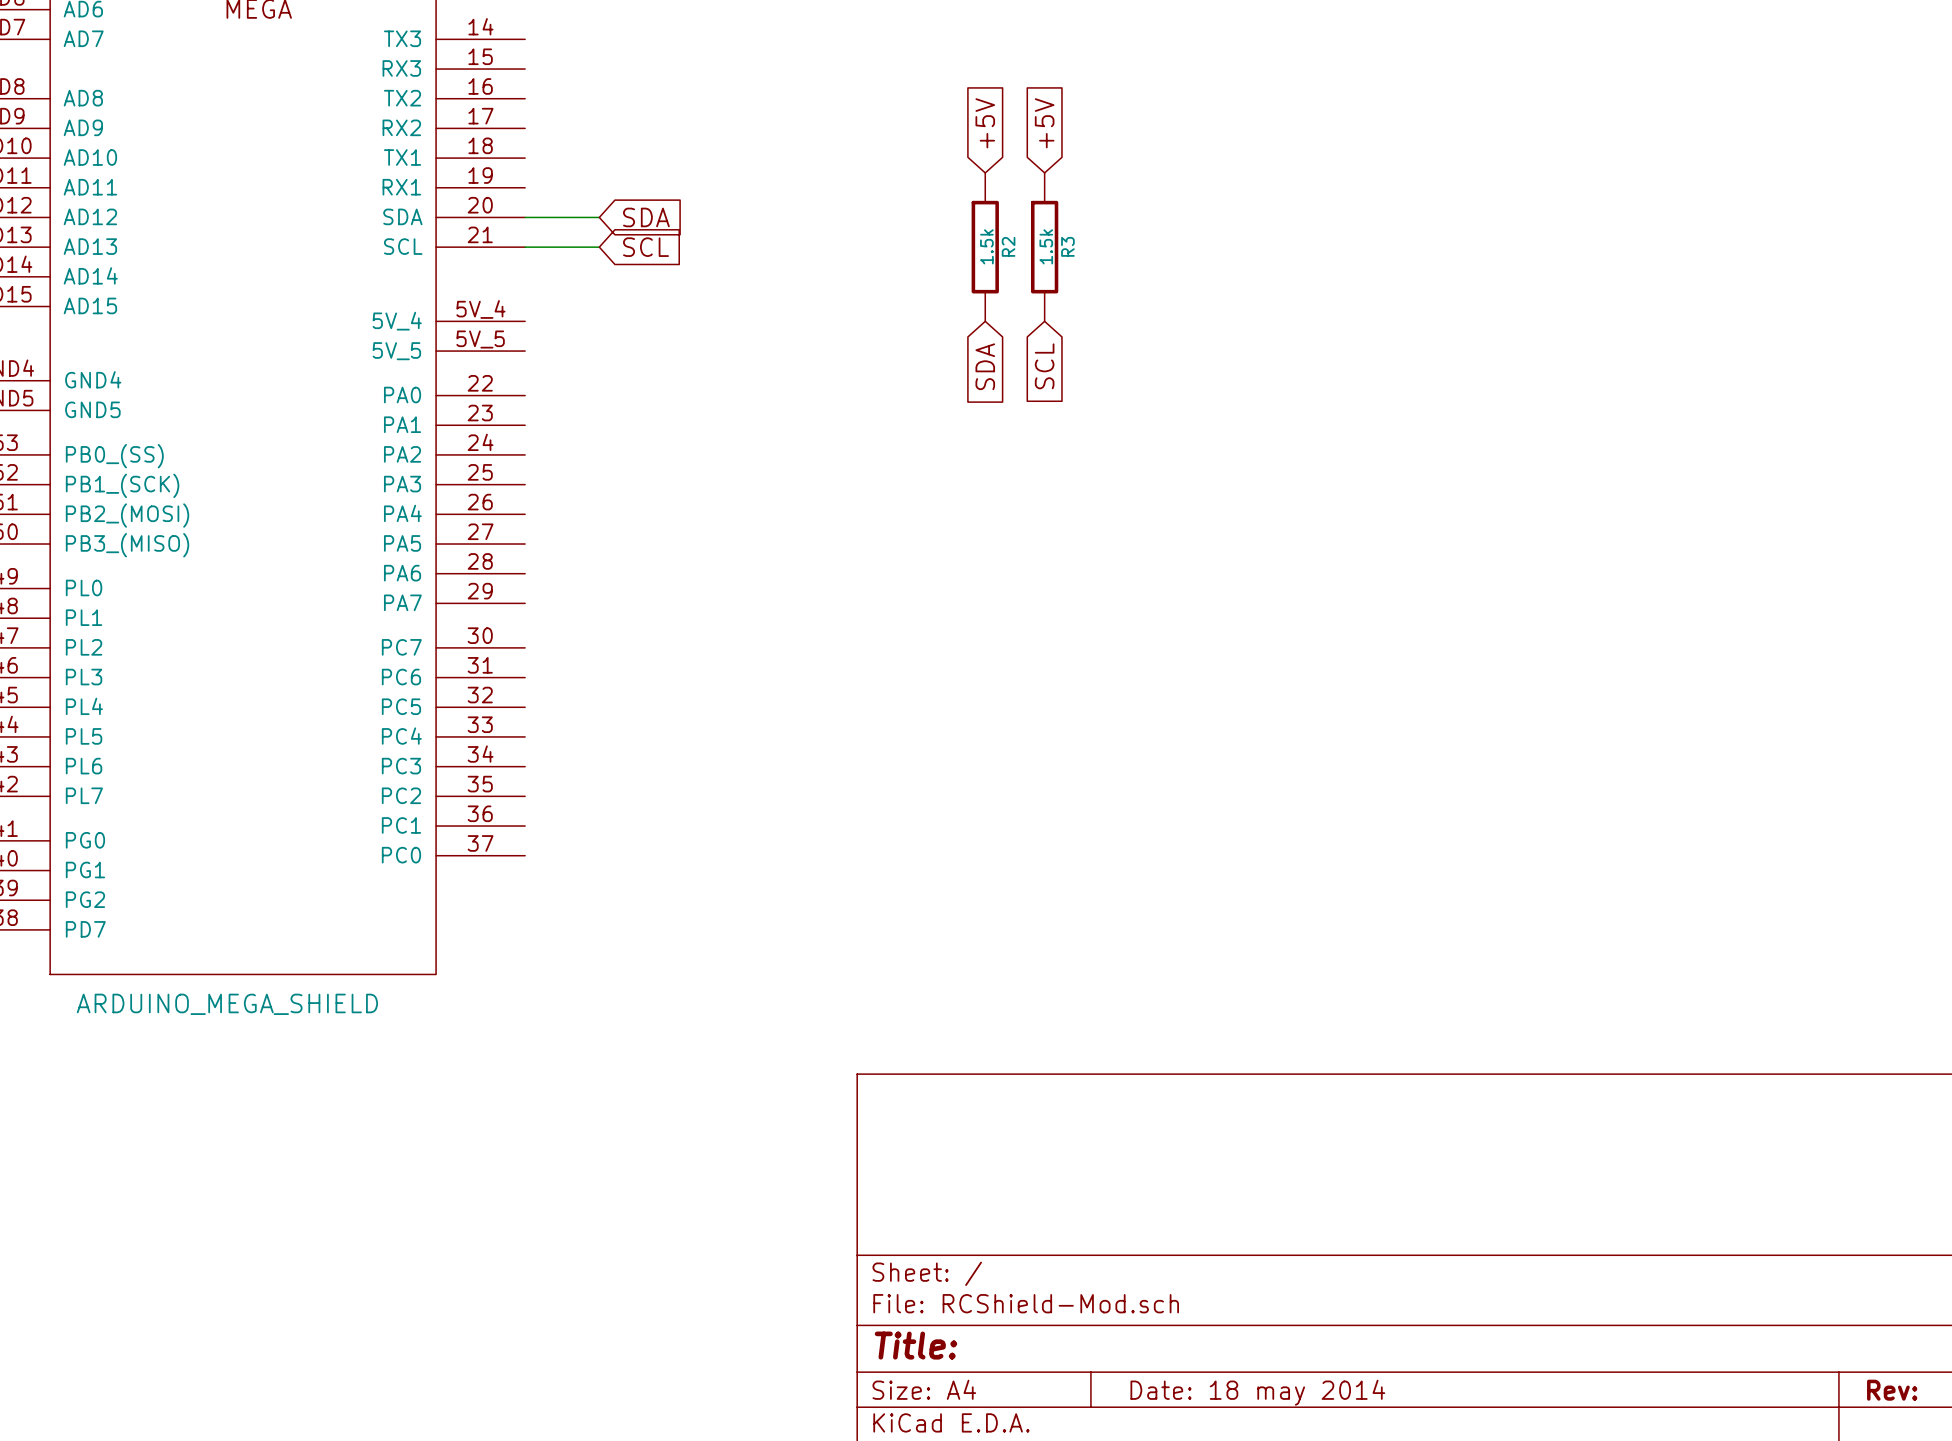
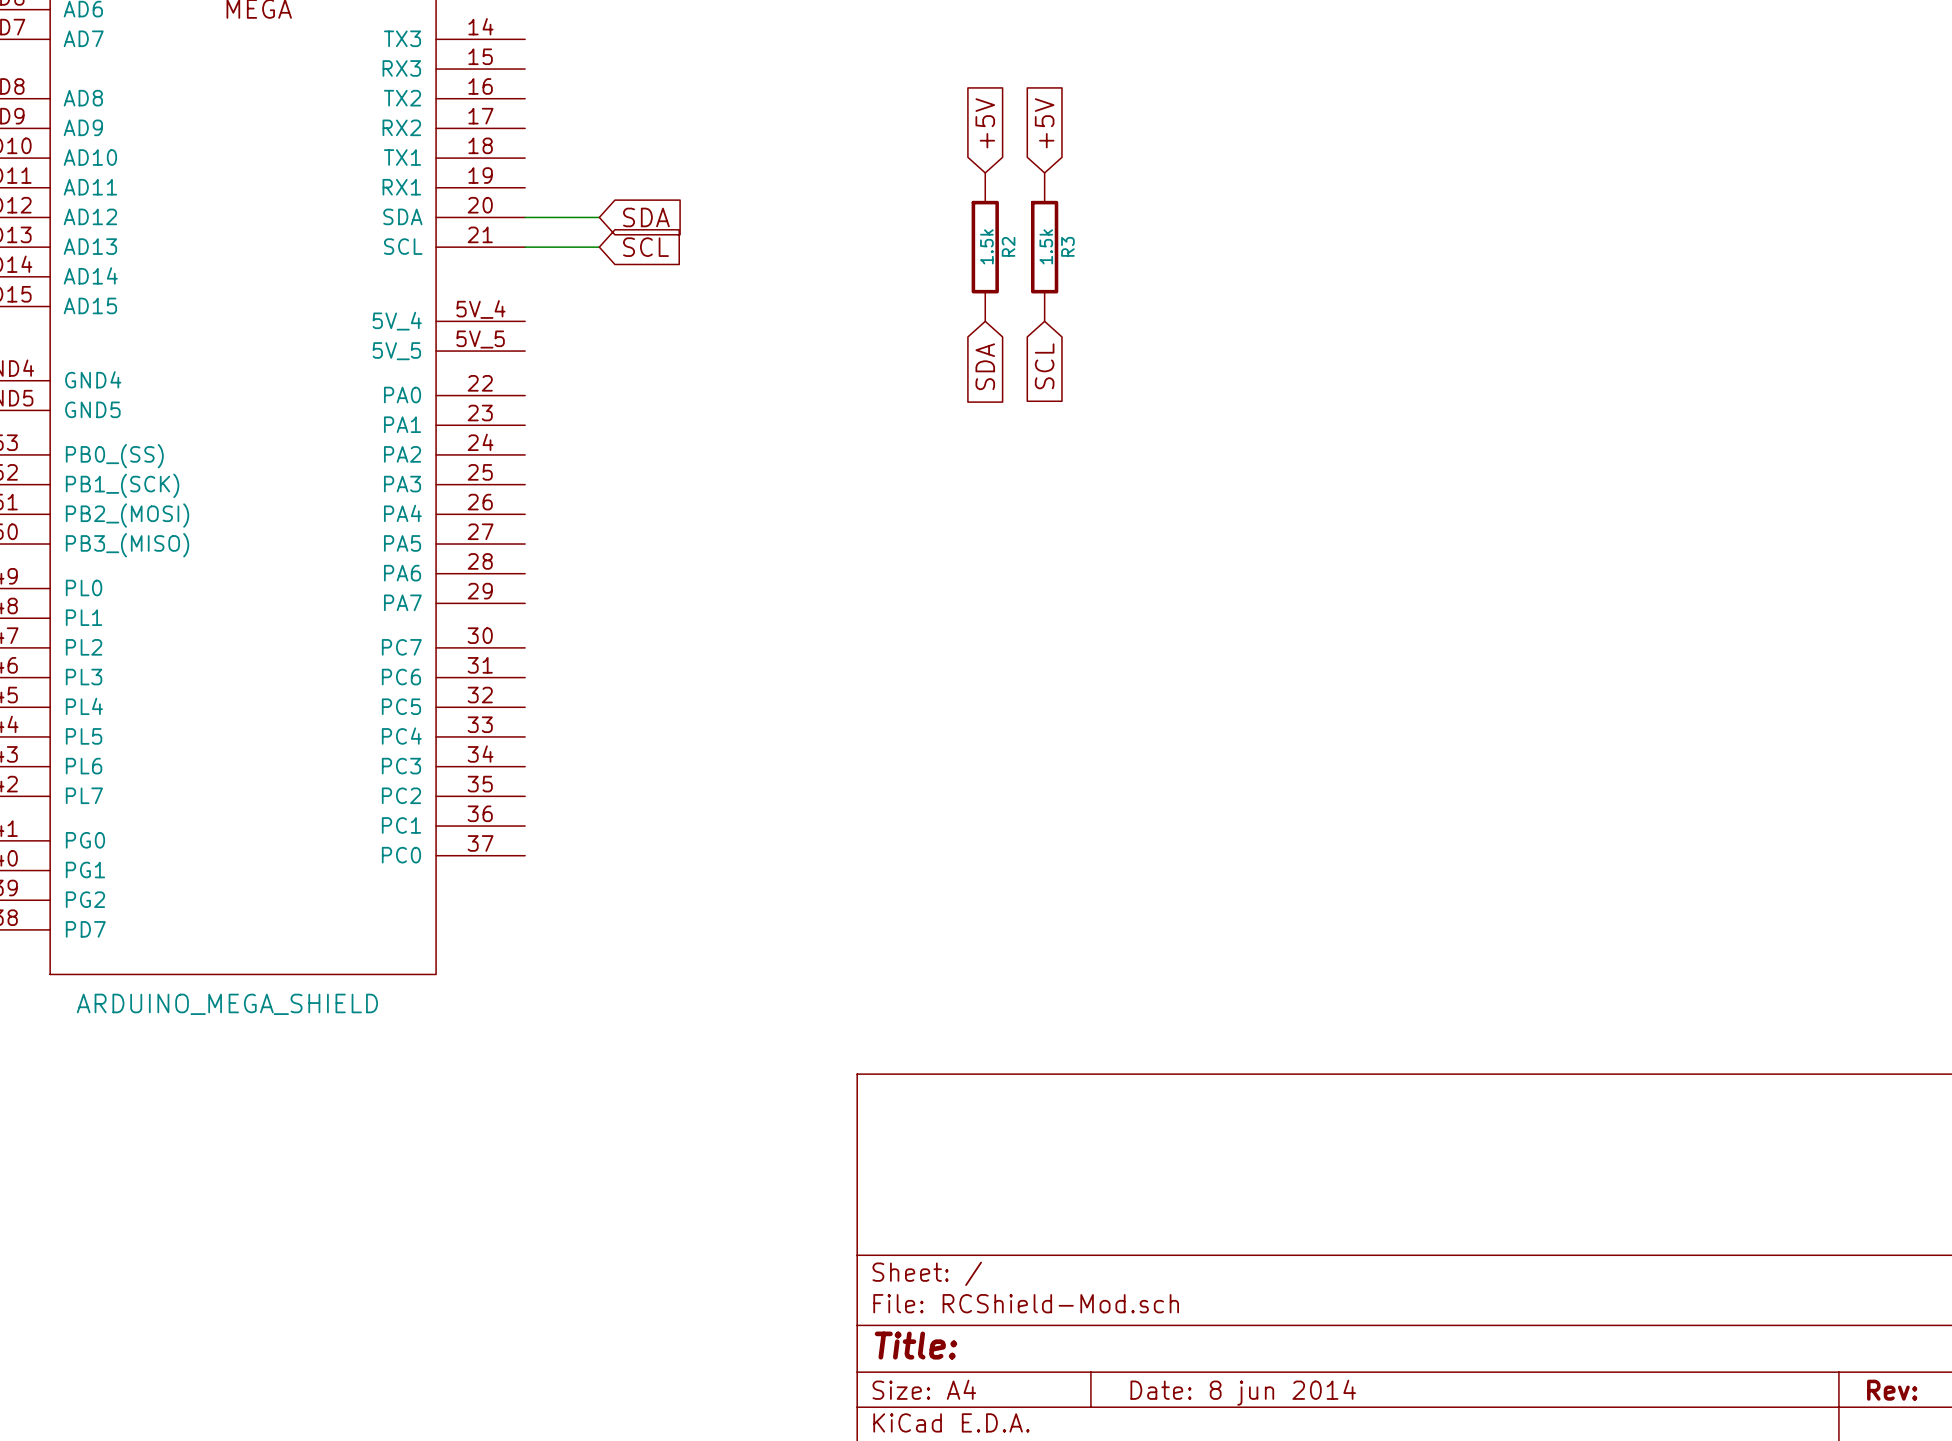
title block: Date: 18 may 2014 (1257, 1392) -> Date: 8 jun 2014 (1243, 1392)

